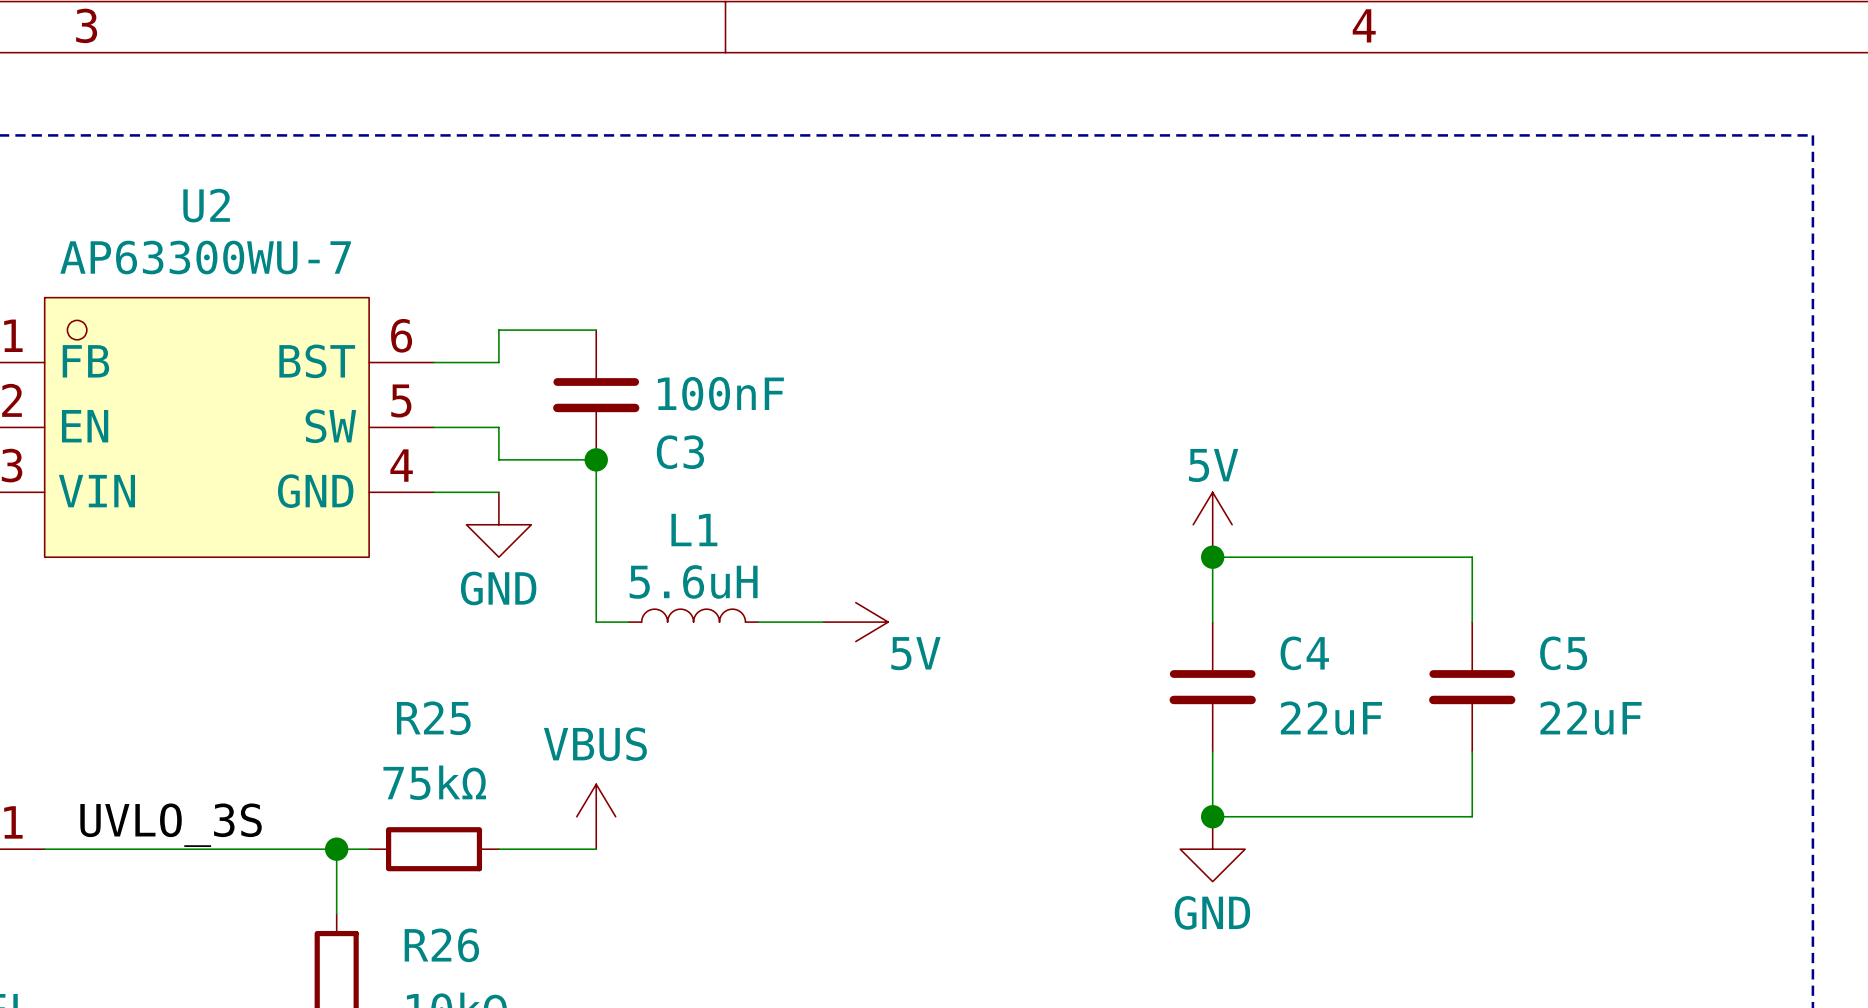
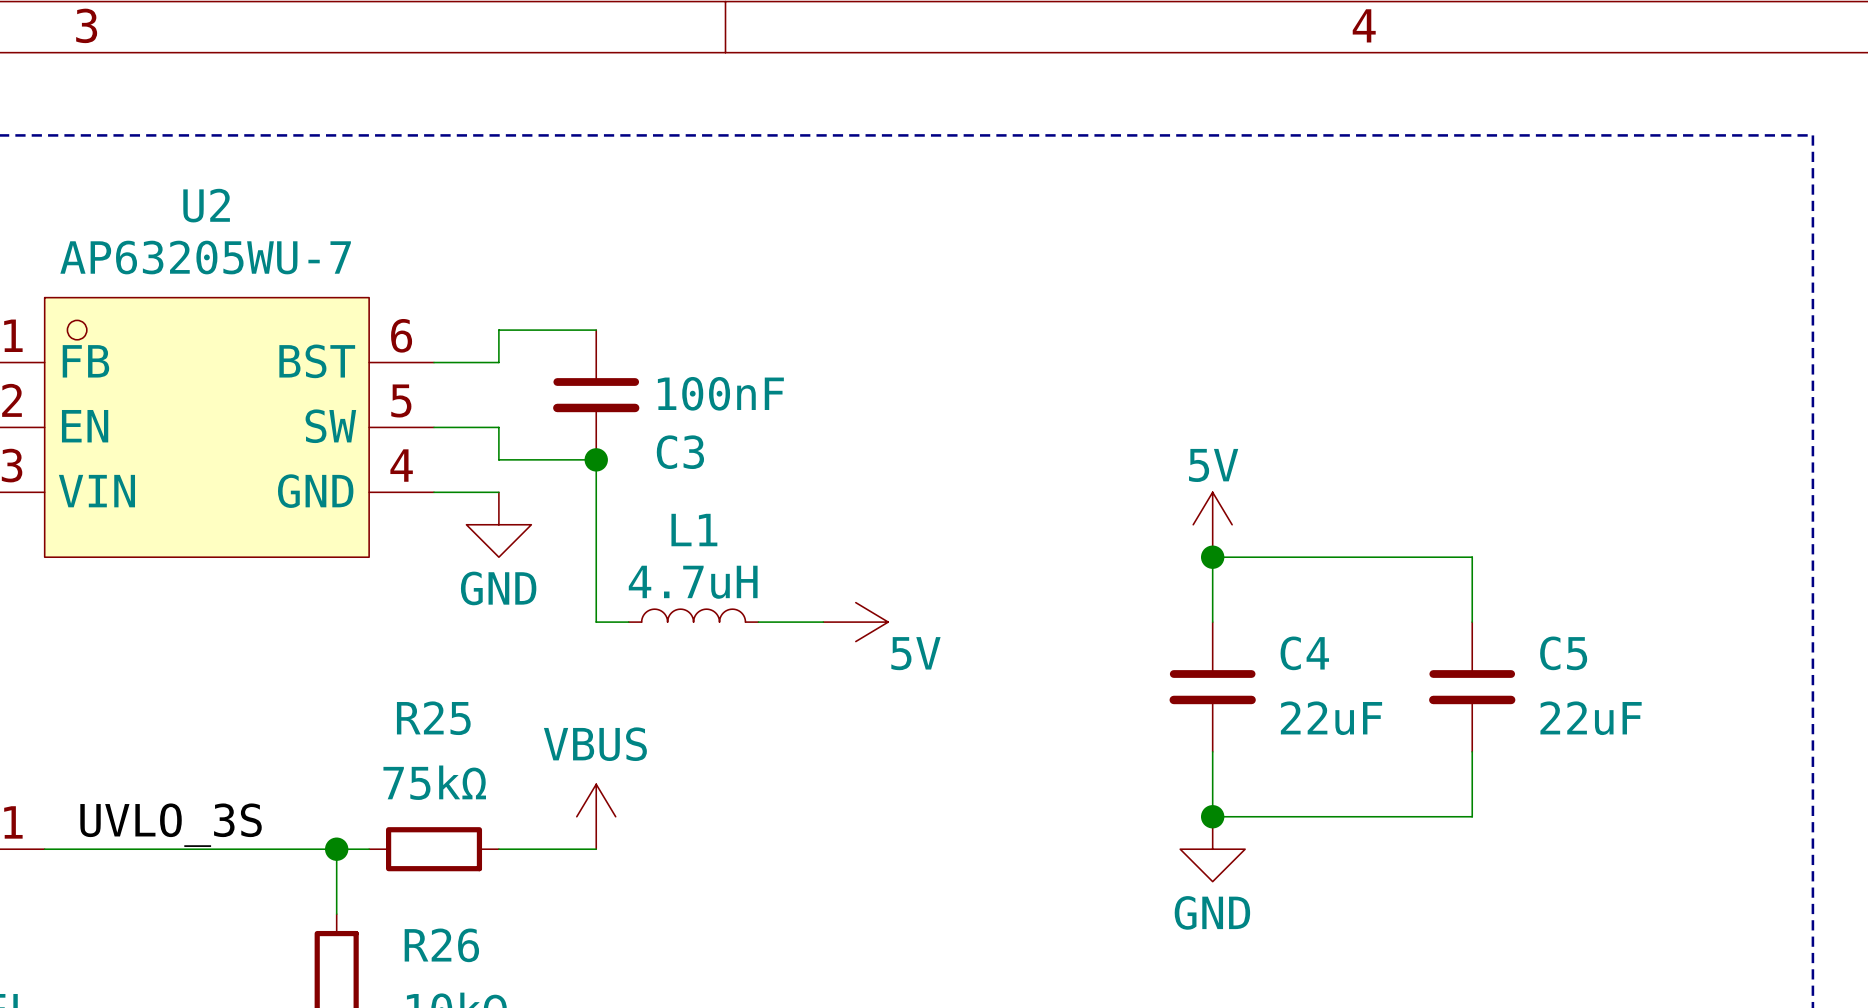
U2 value: AP63300WU-7 (205, 257) -> AP63205WU-7 (205, 257)
L1 value: 5.6uH (693, 581) -> 4.7uH (693, 582)

